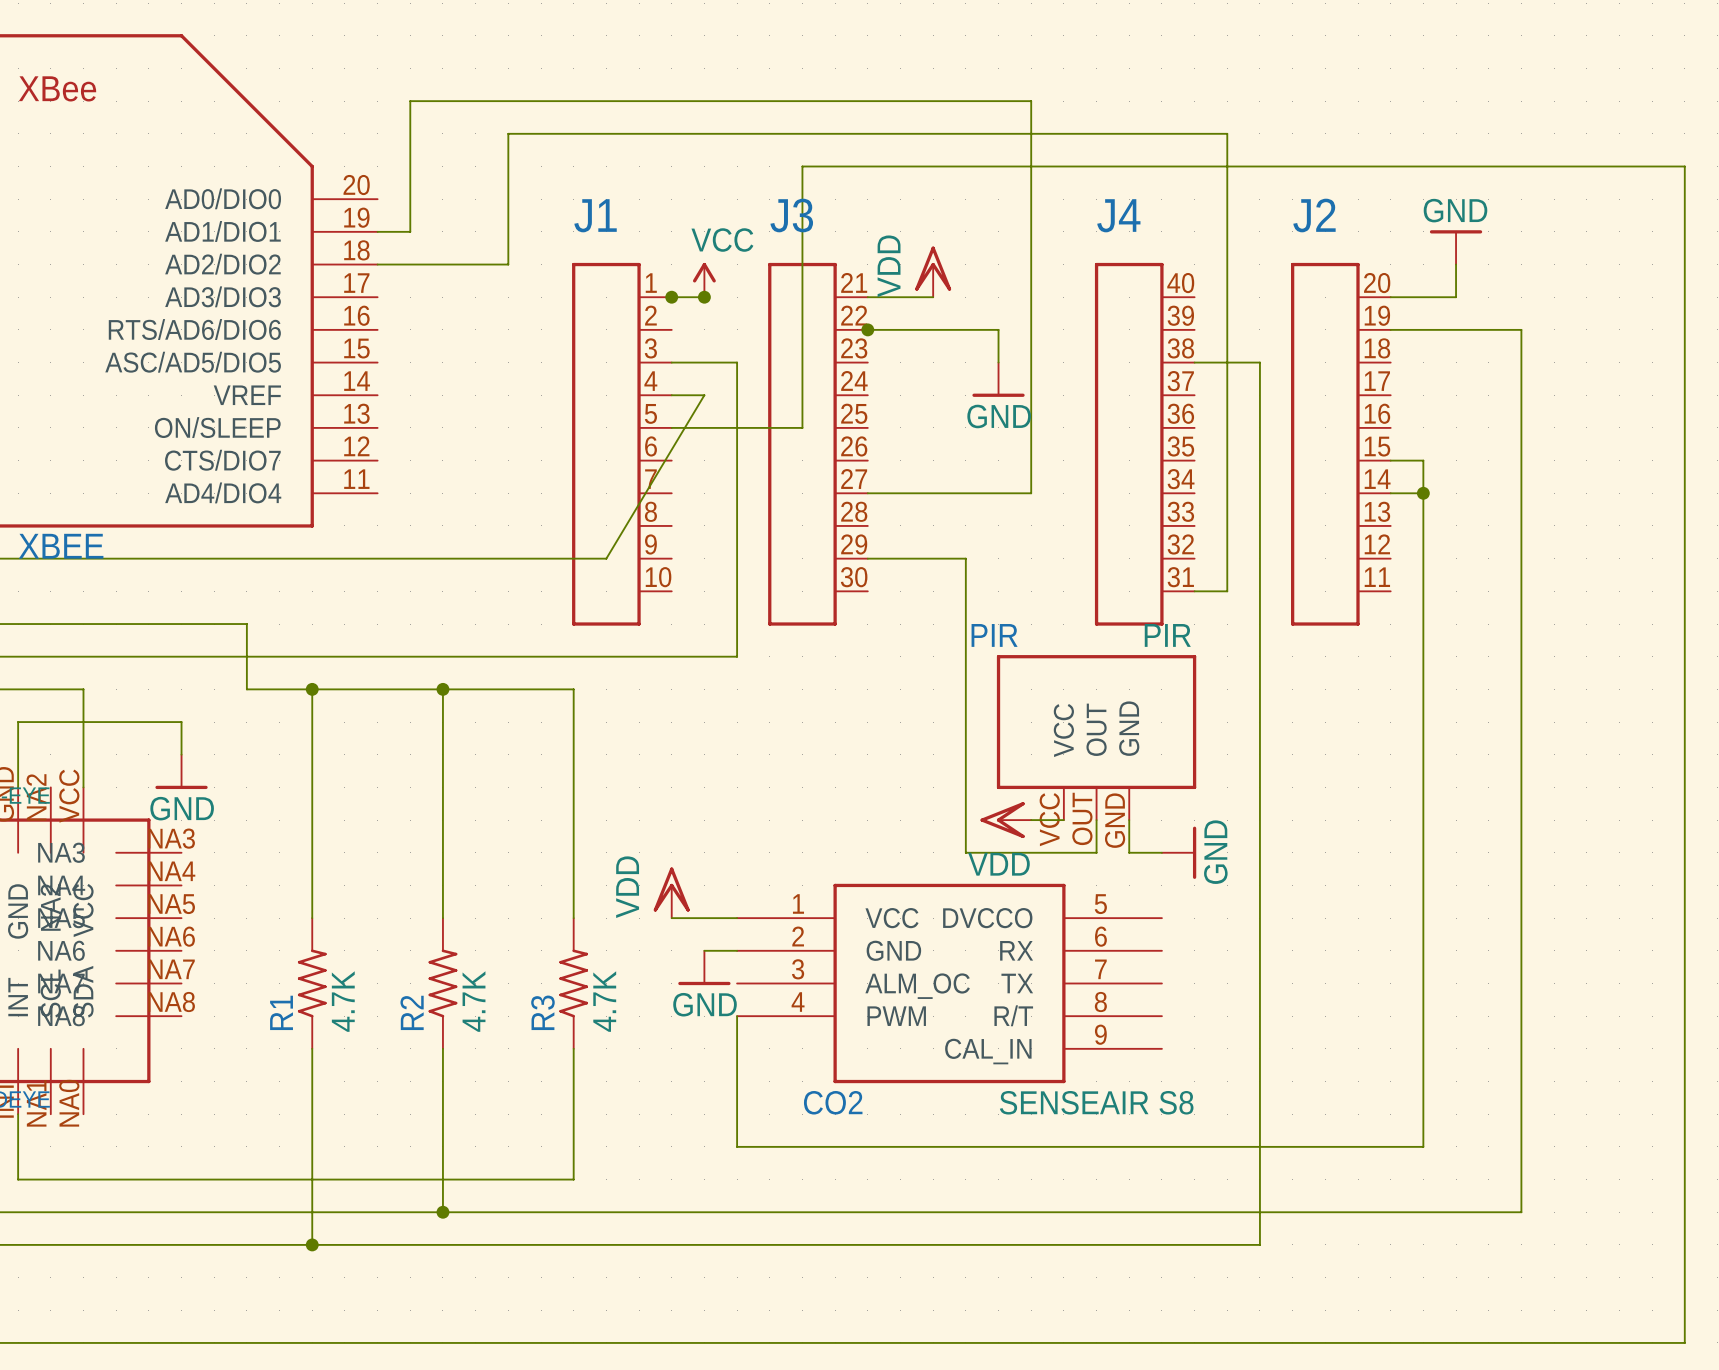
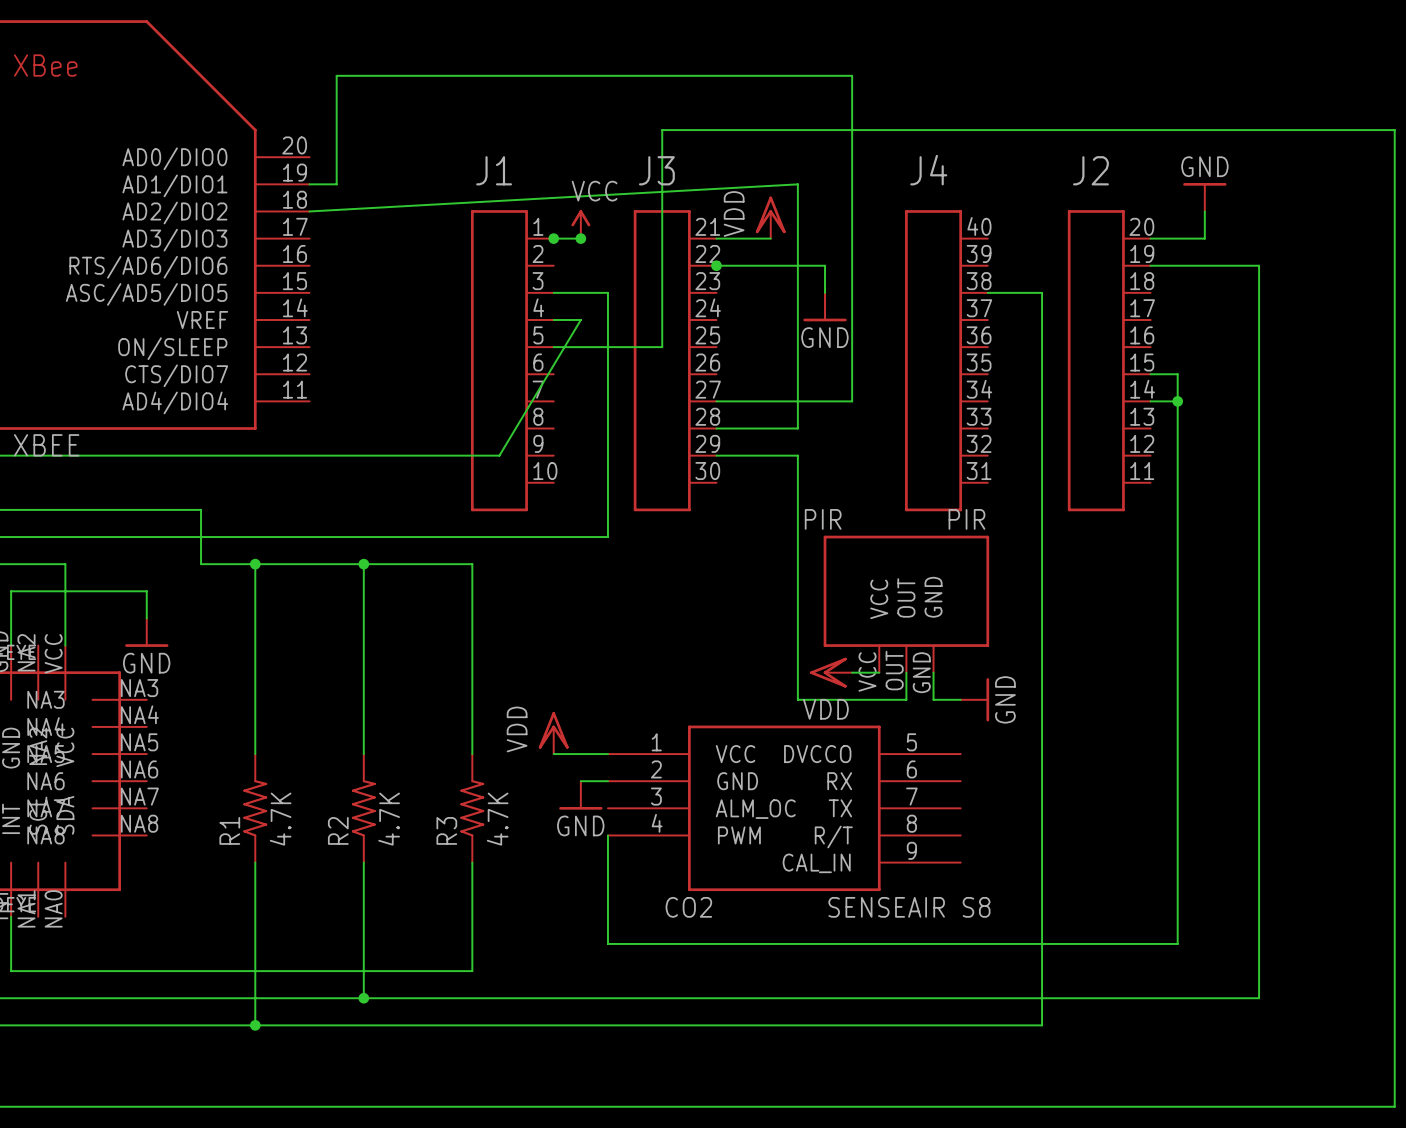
wire: (377, 264) (508, 264) (508, 133) (1227, 133) (1227, 591) (1194, 591) -> (309, 211) (797, 184) (797, 428) (716, 428)

